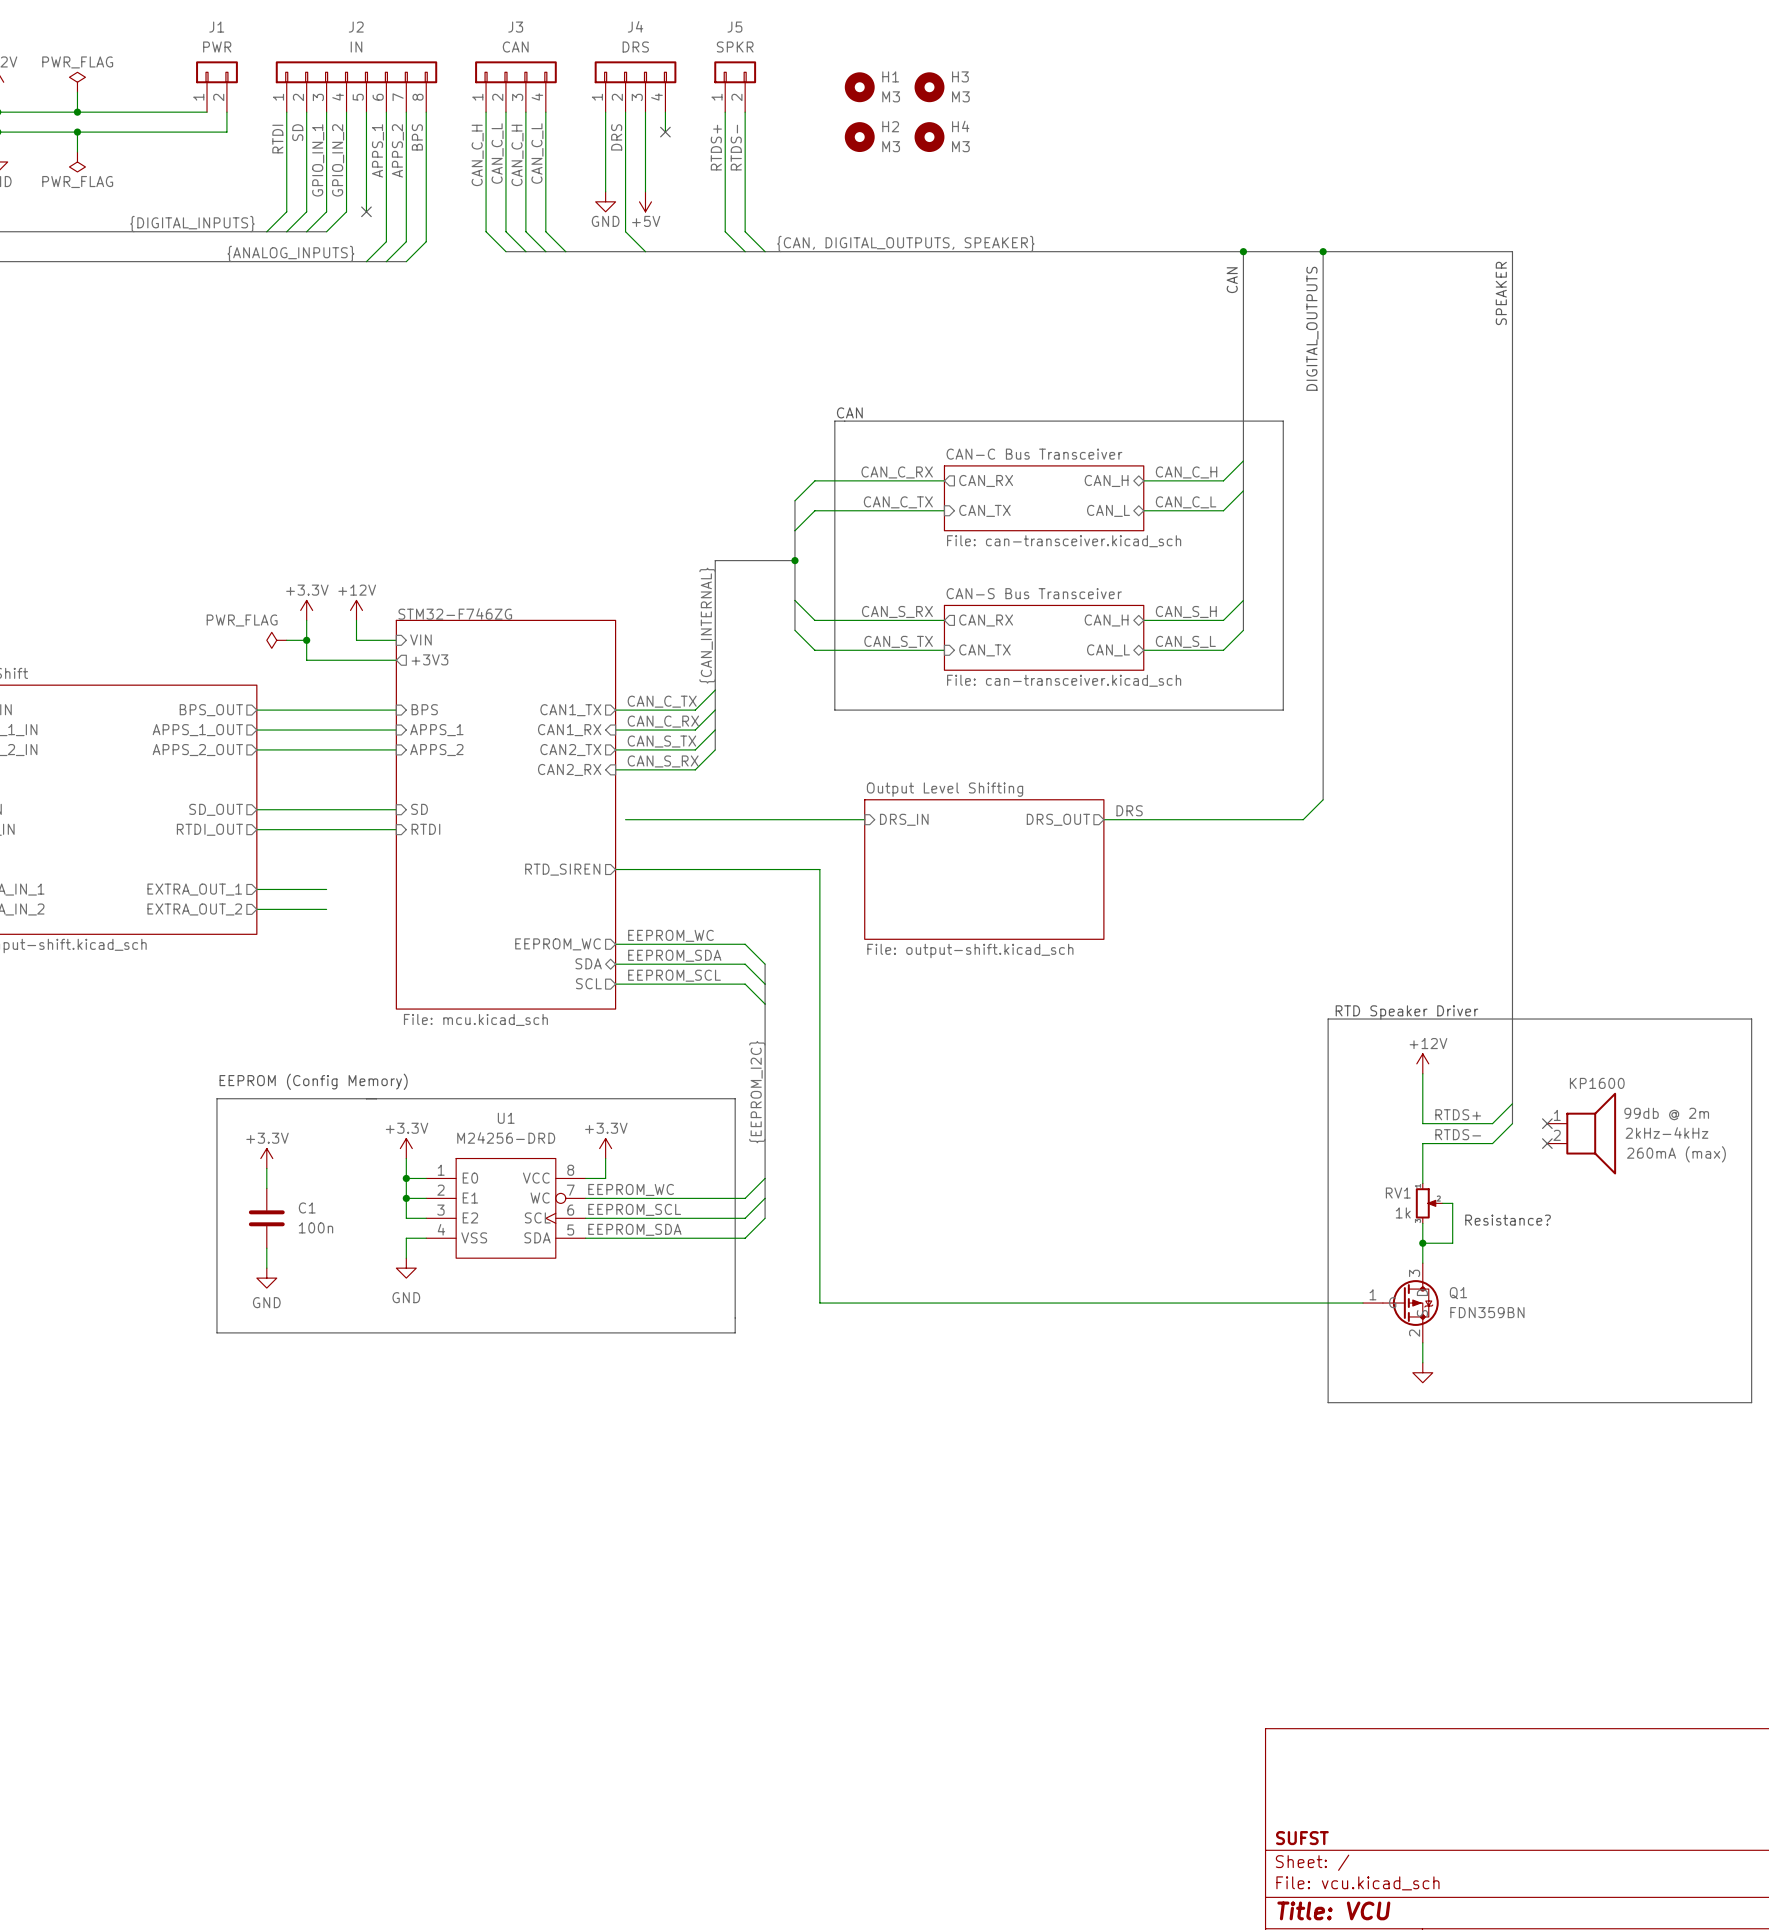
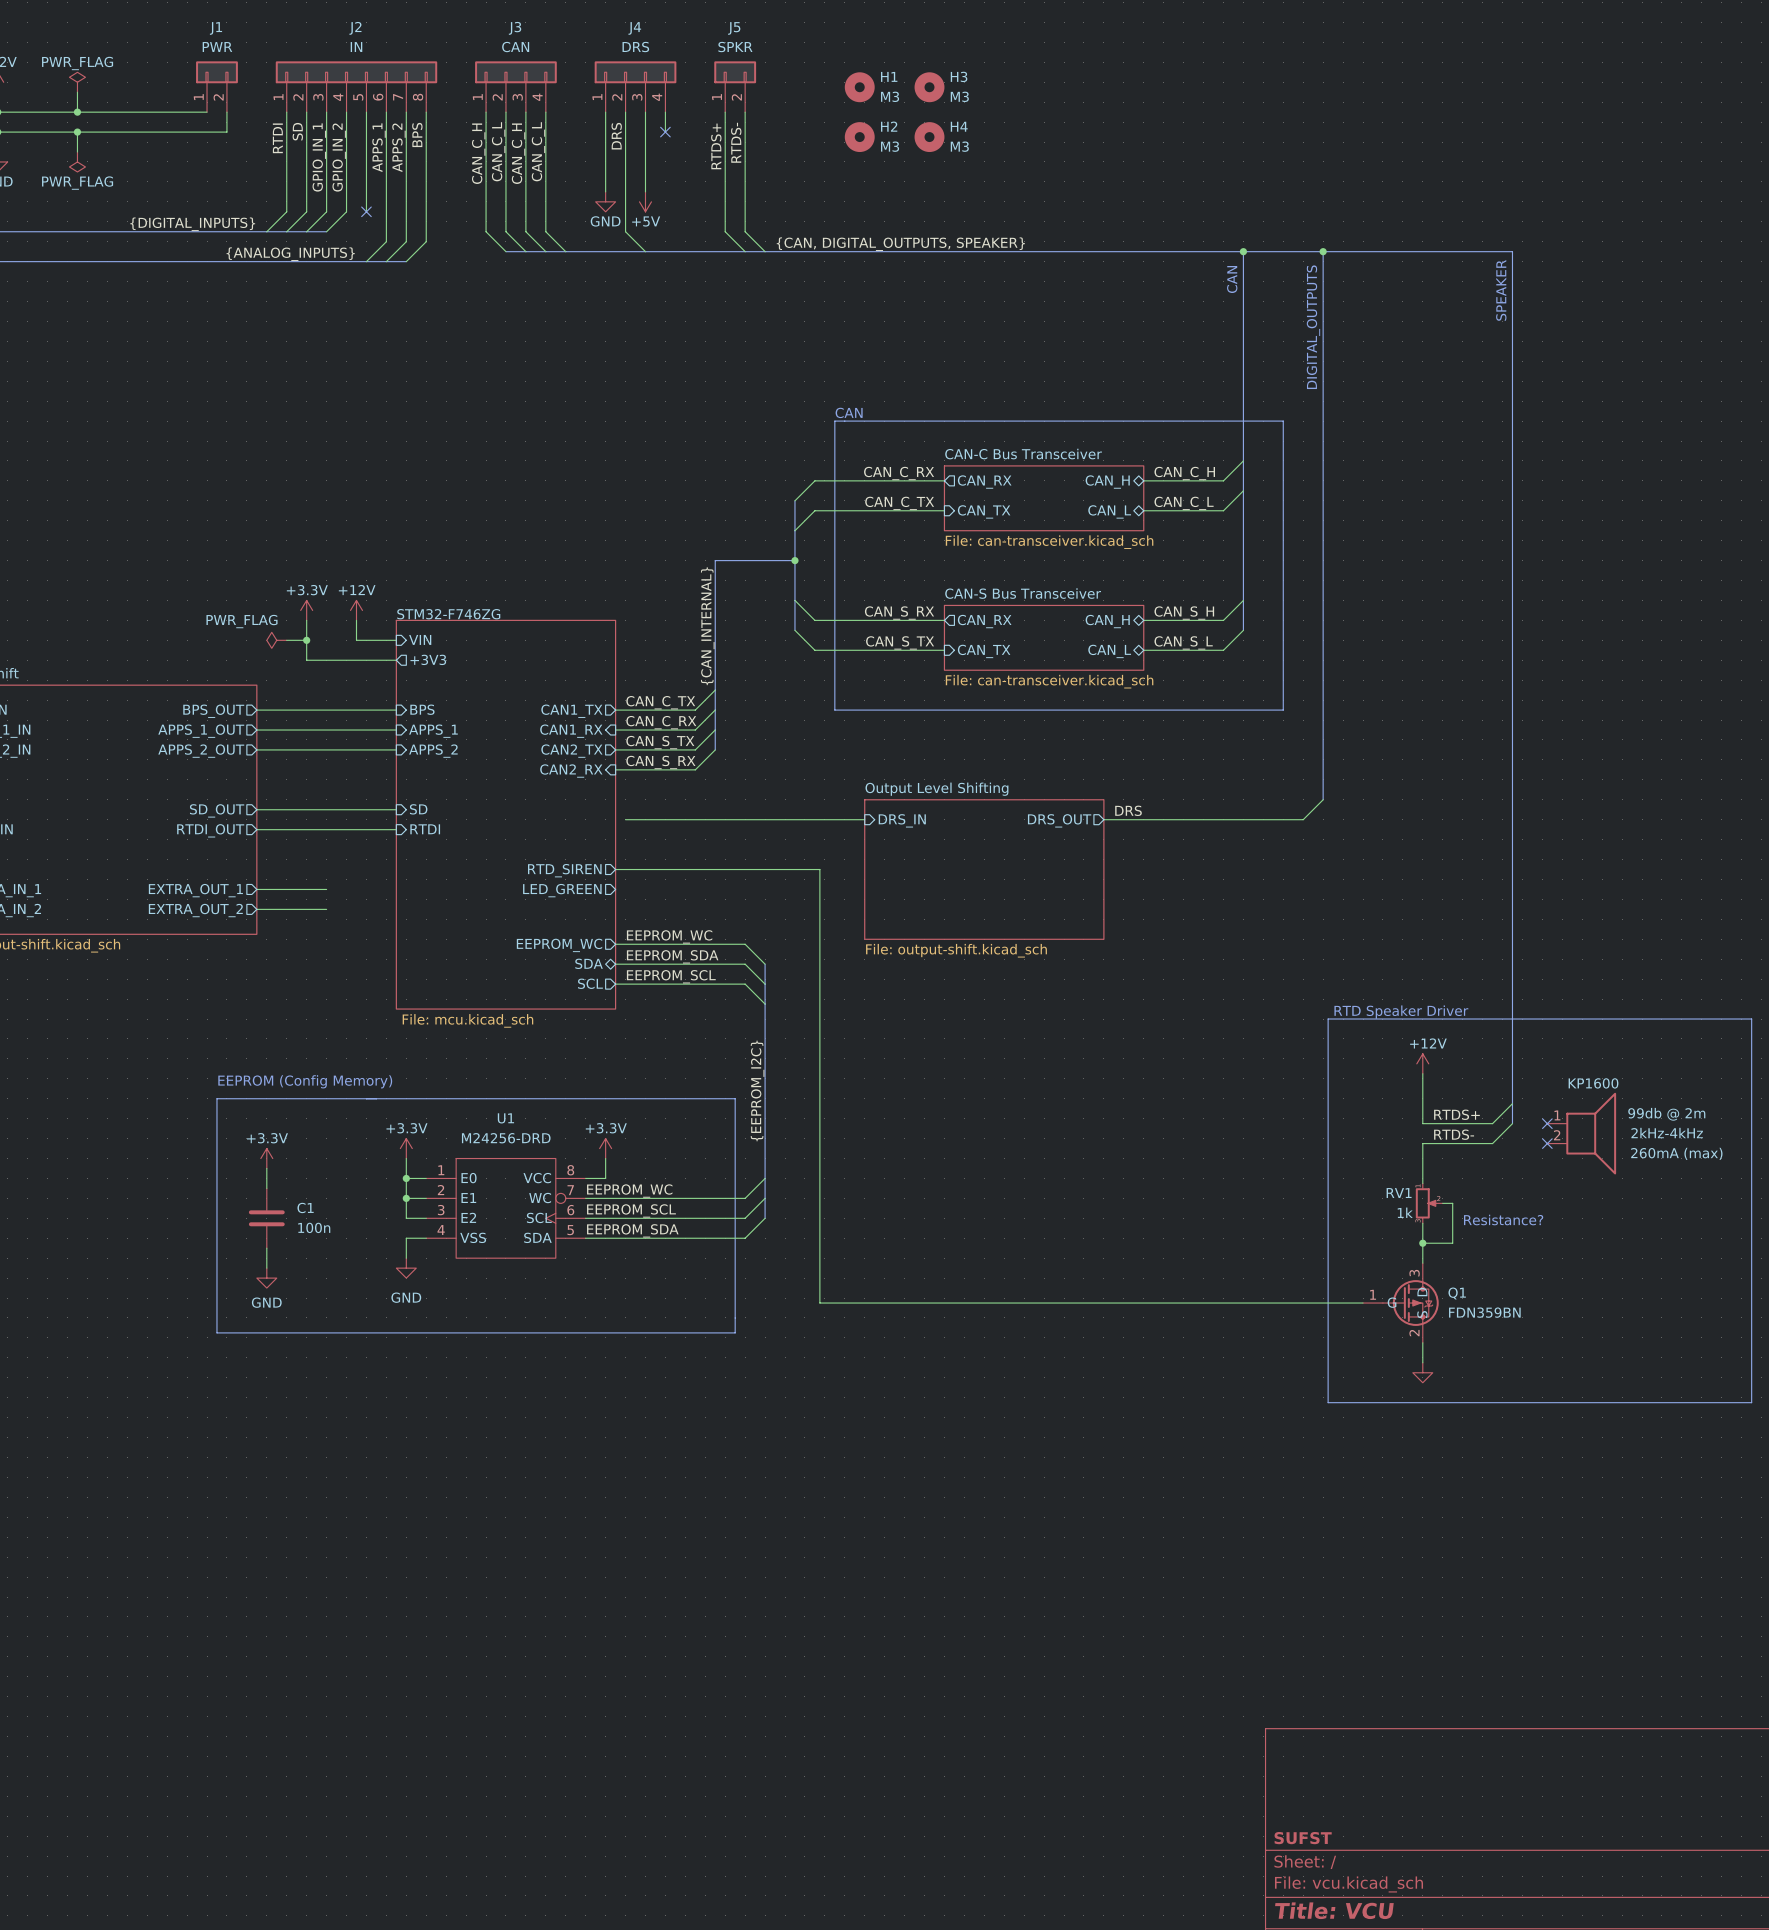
sheet pin: none -> LED_GREEN (562, 890)

